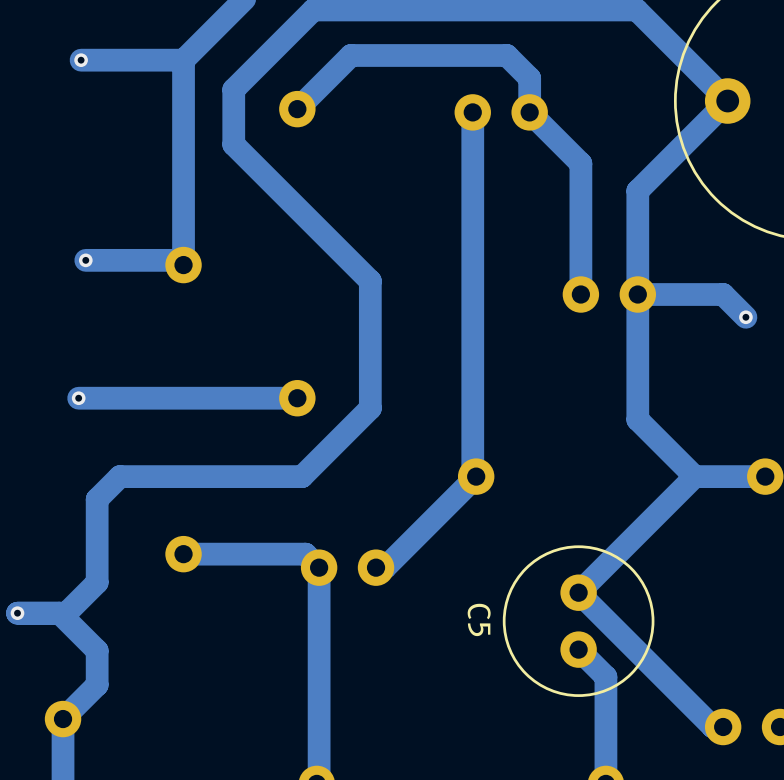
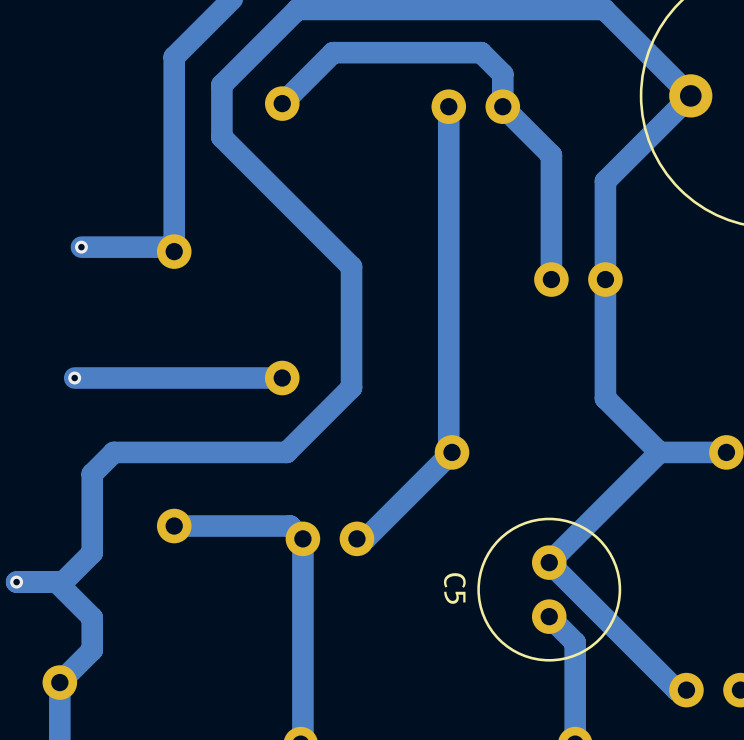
via: (81, 60) -> none
track: (183, 60) (81, 60) -> none
track: (637, 294) (723, 294) (745, 317) -> none
via: (745, 317) -> none

